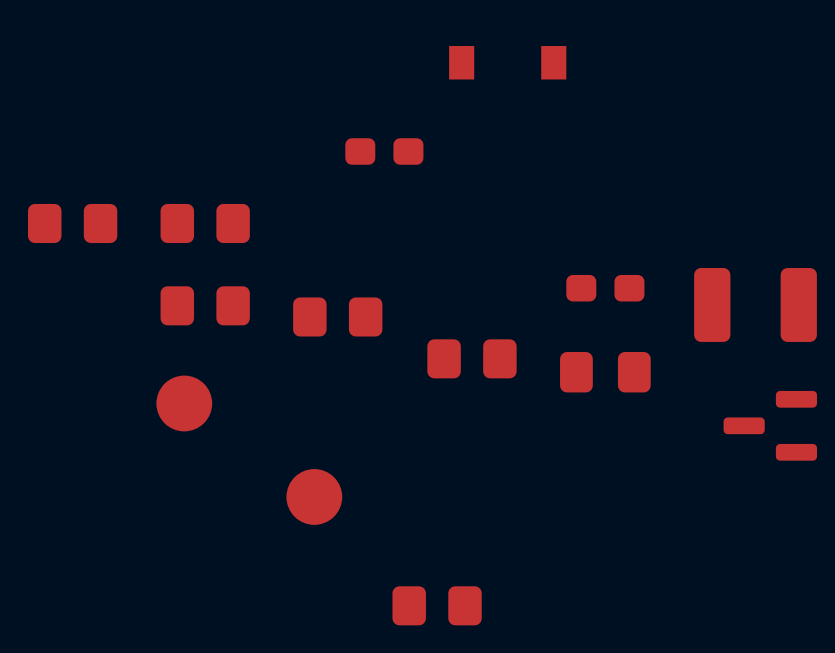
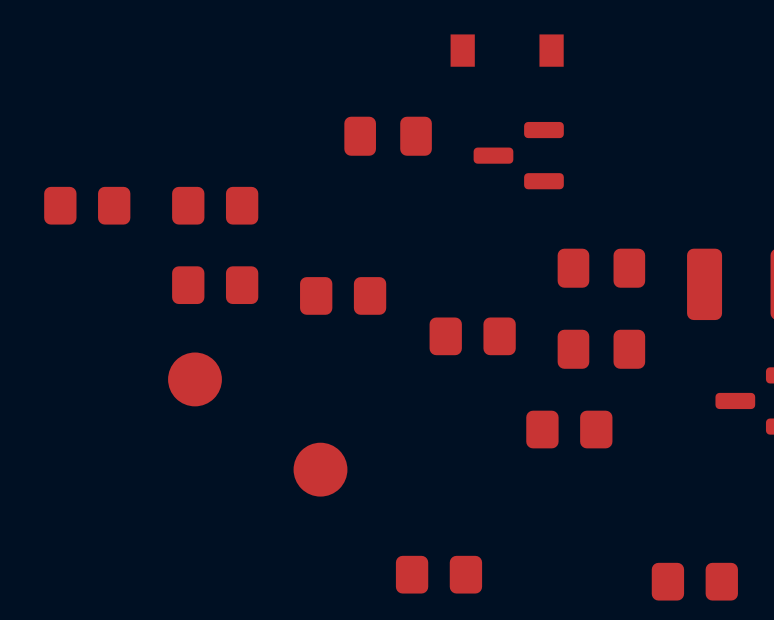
part footprint: [345, 138, 424, 165] -> [344, 116, 432, 156]
part: none -> (518, 155)
part footprint: [566, 274, 645, 302] -> [557, 248, 646, 288]
part: none -> (569, 429)
part: none -> (694, 581)

